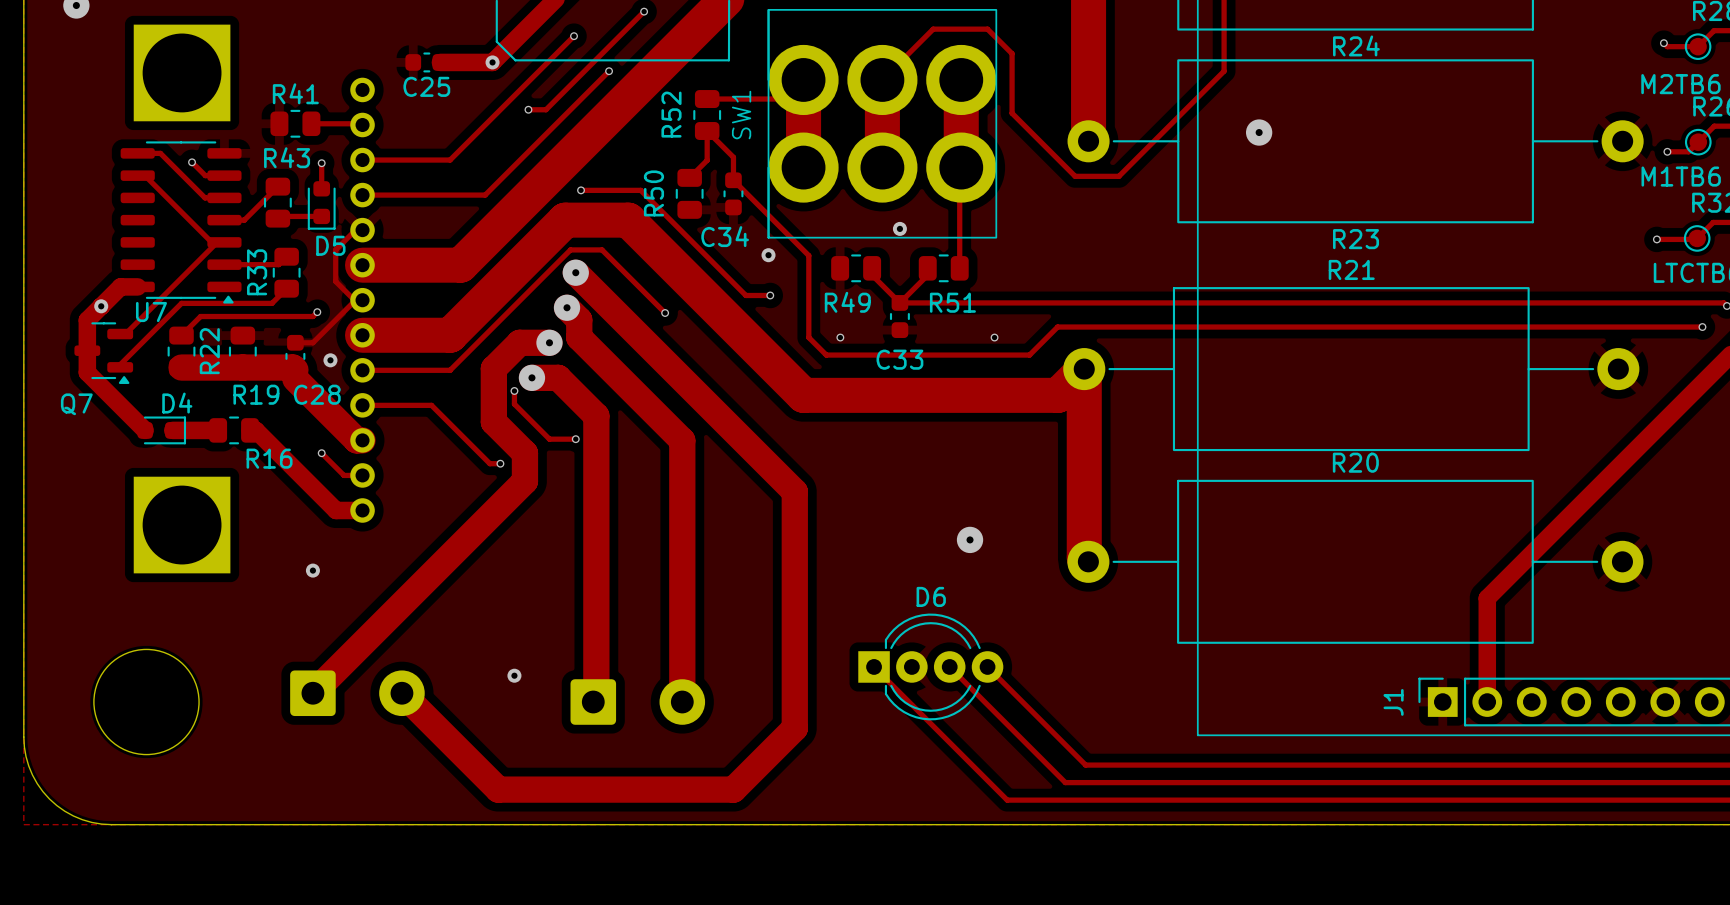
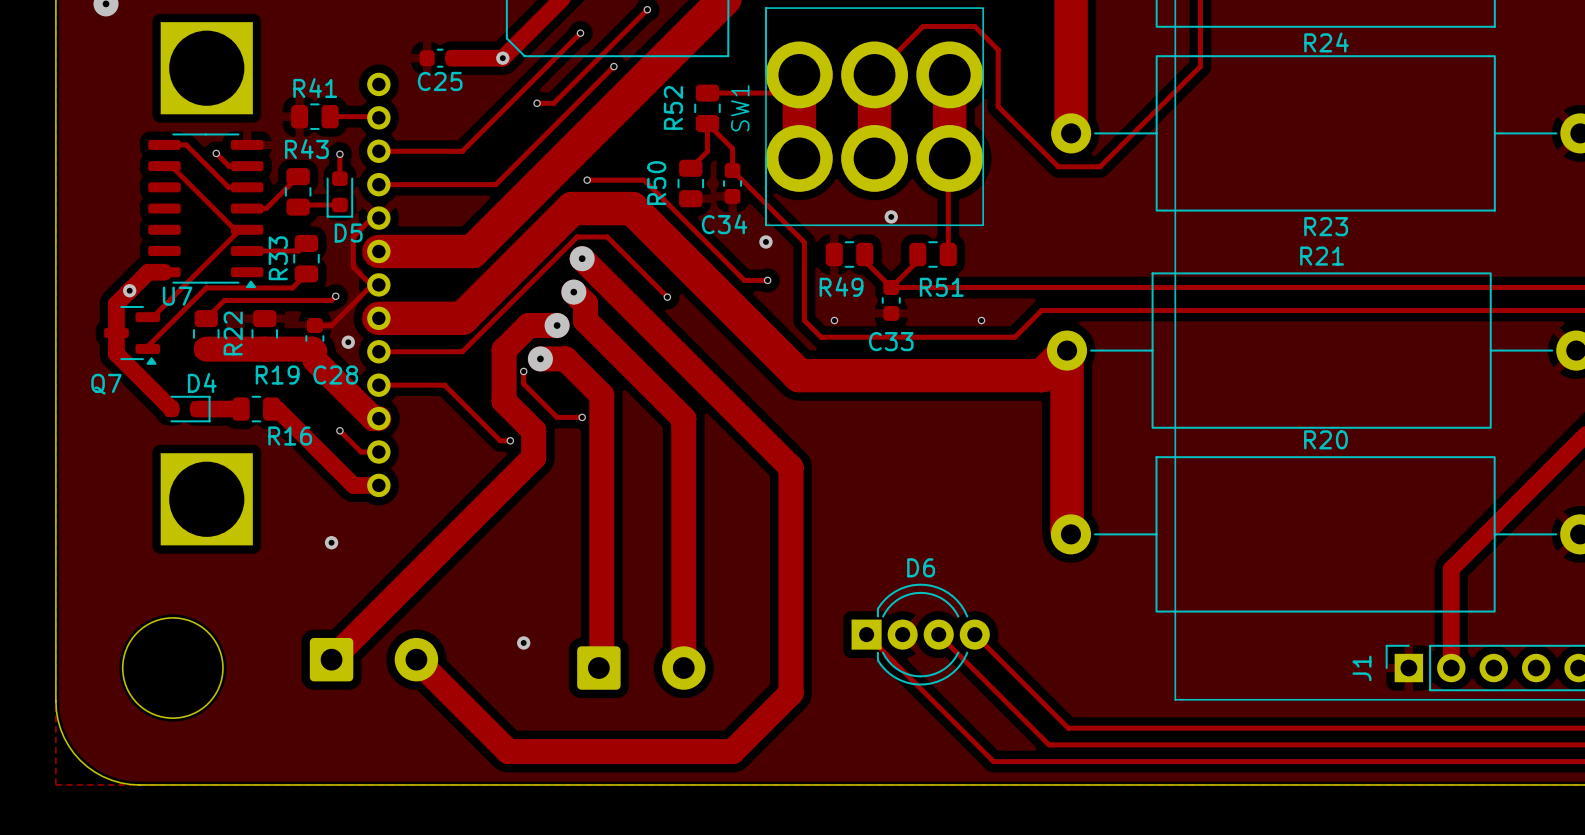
via: (1259, 132) -> none
via: (970, 539) -> none

